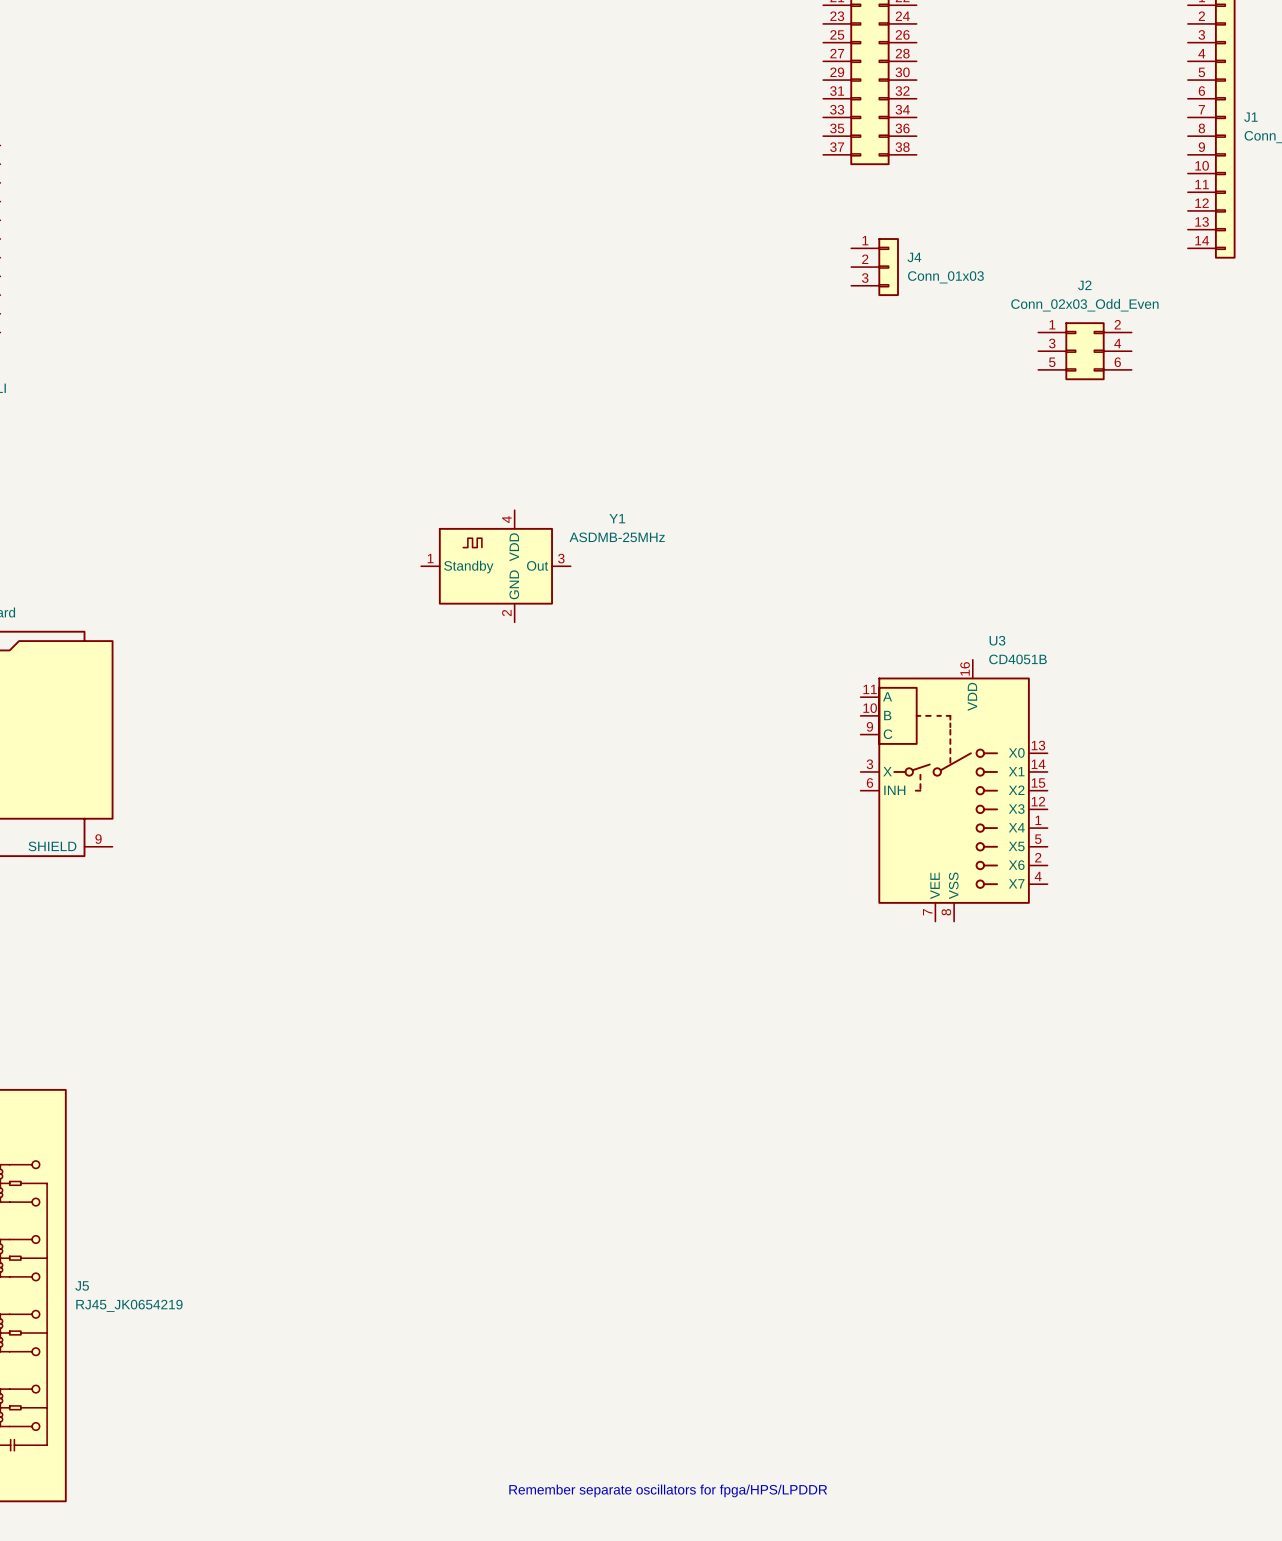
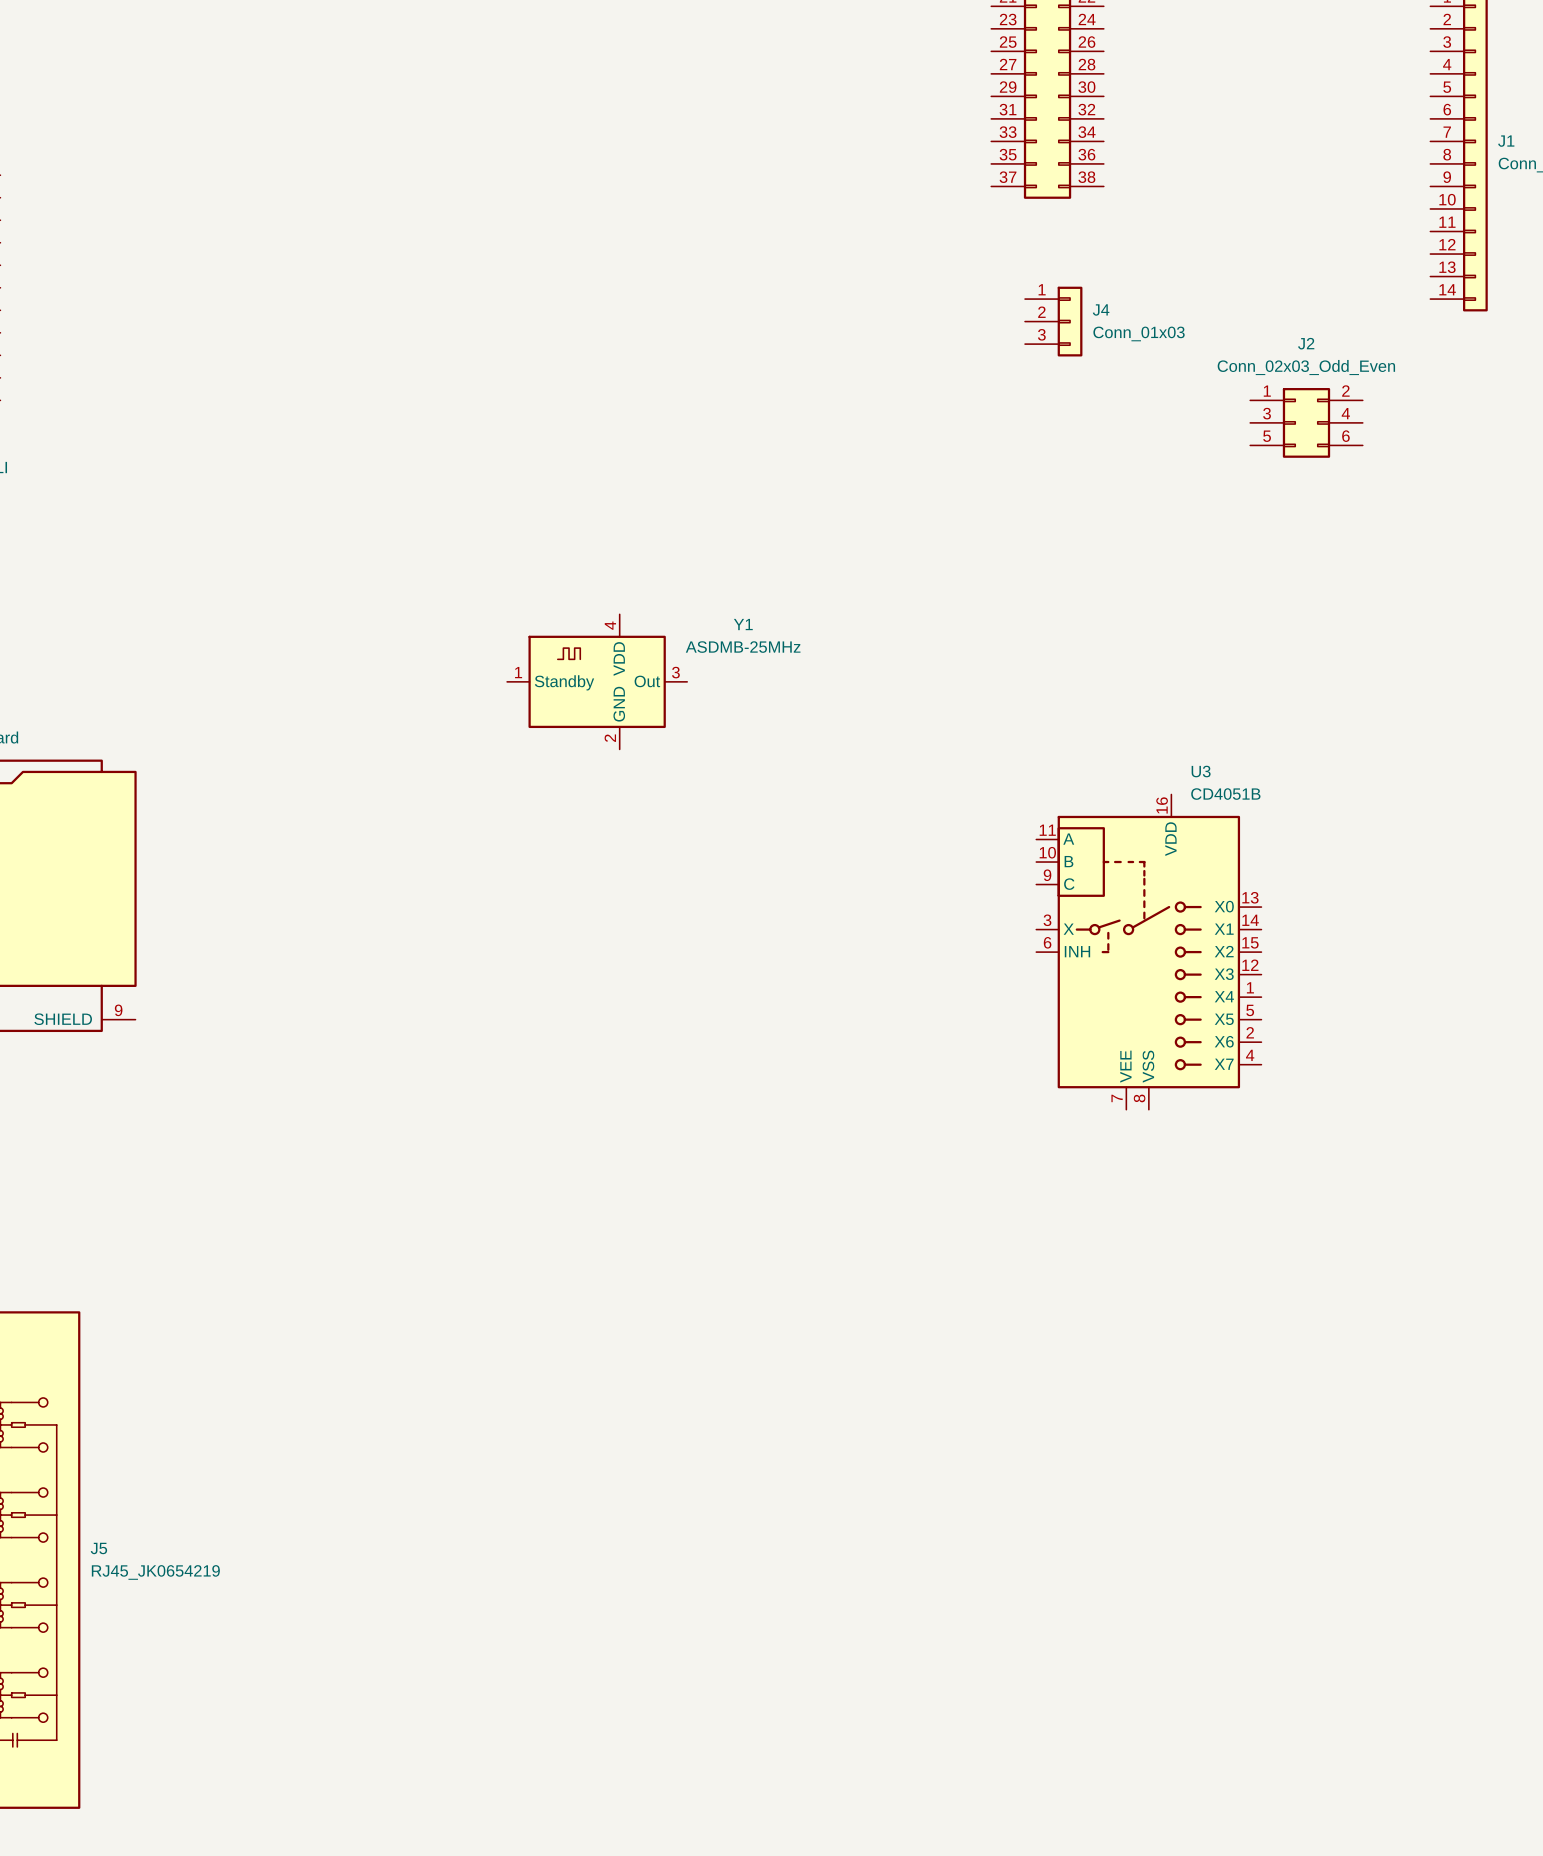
text: Remember separate oscillators for fpga/HPS/LPDDR (668, 1490) -> none

